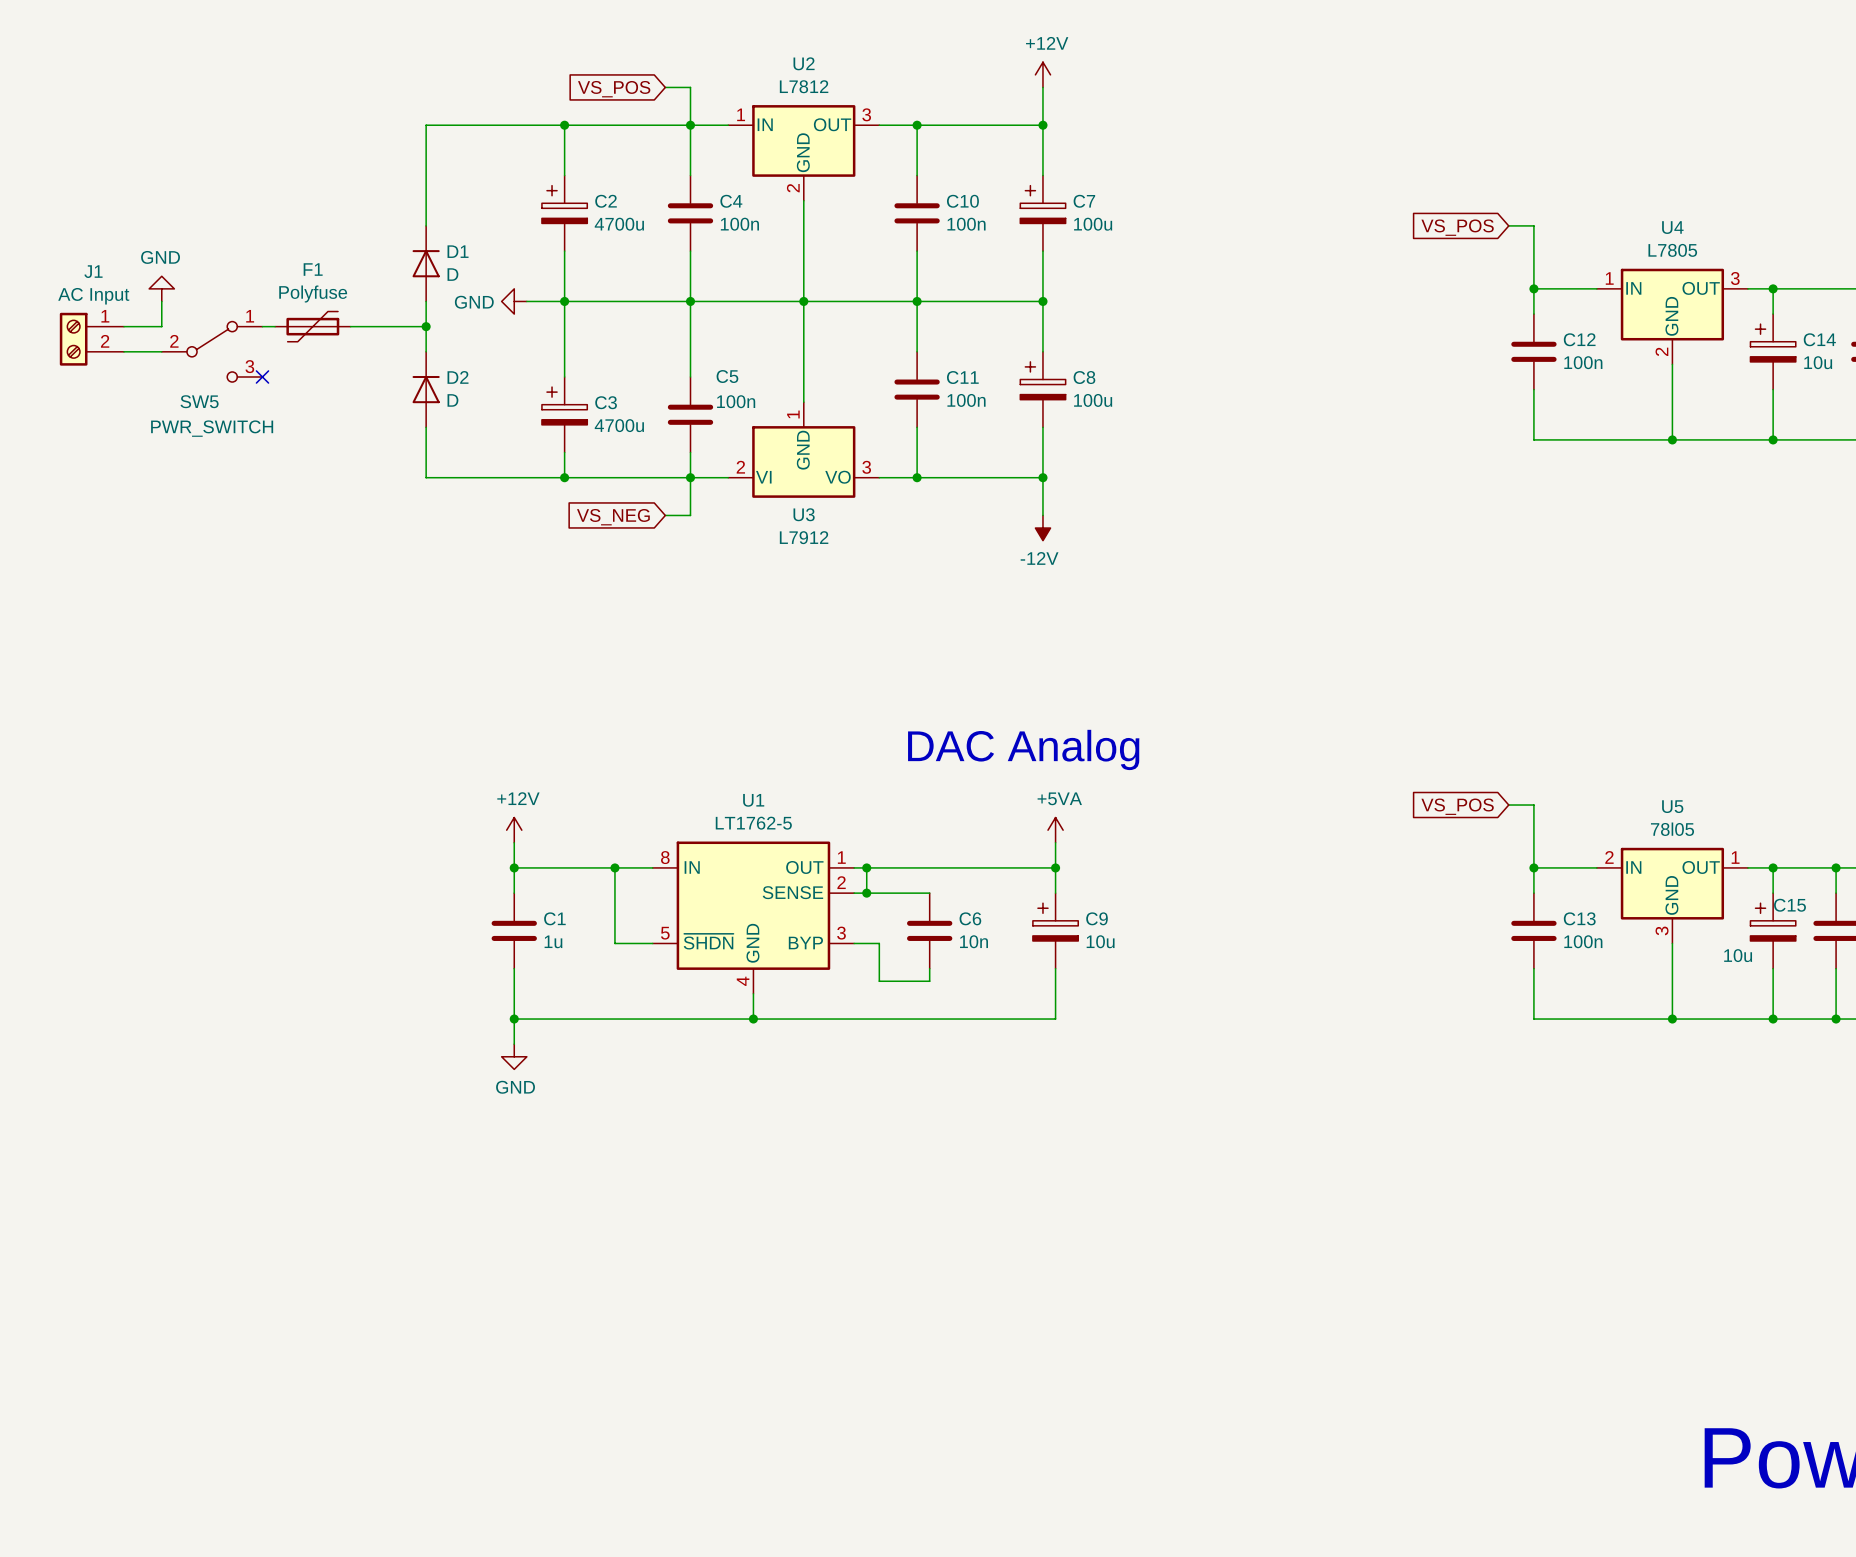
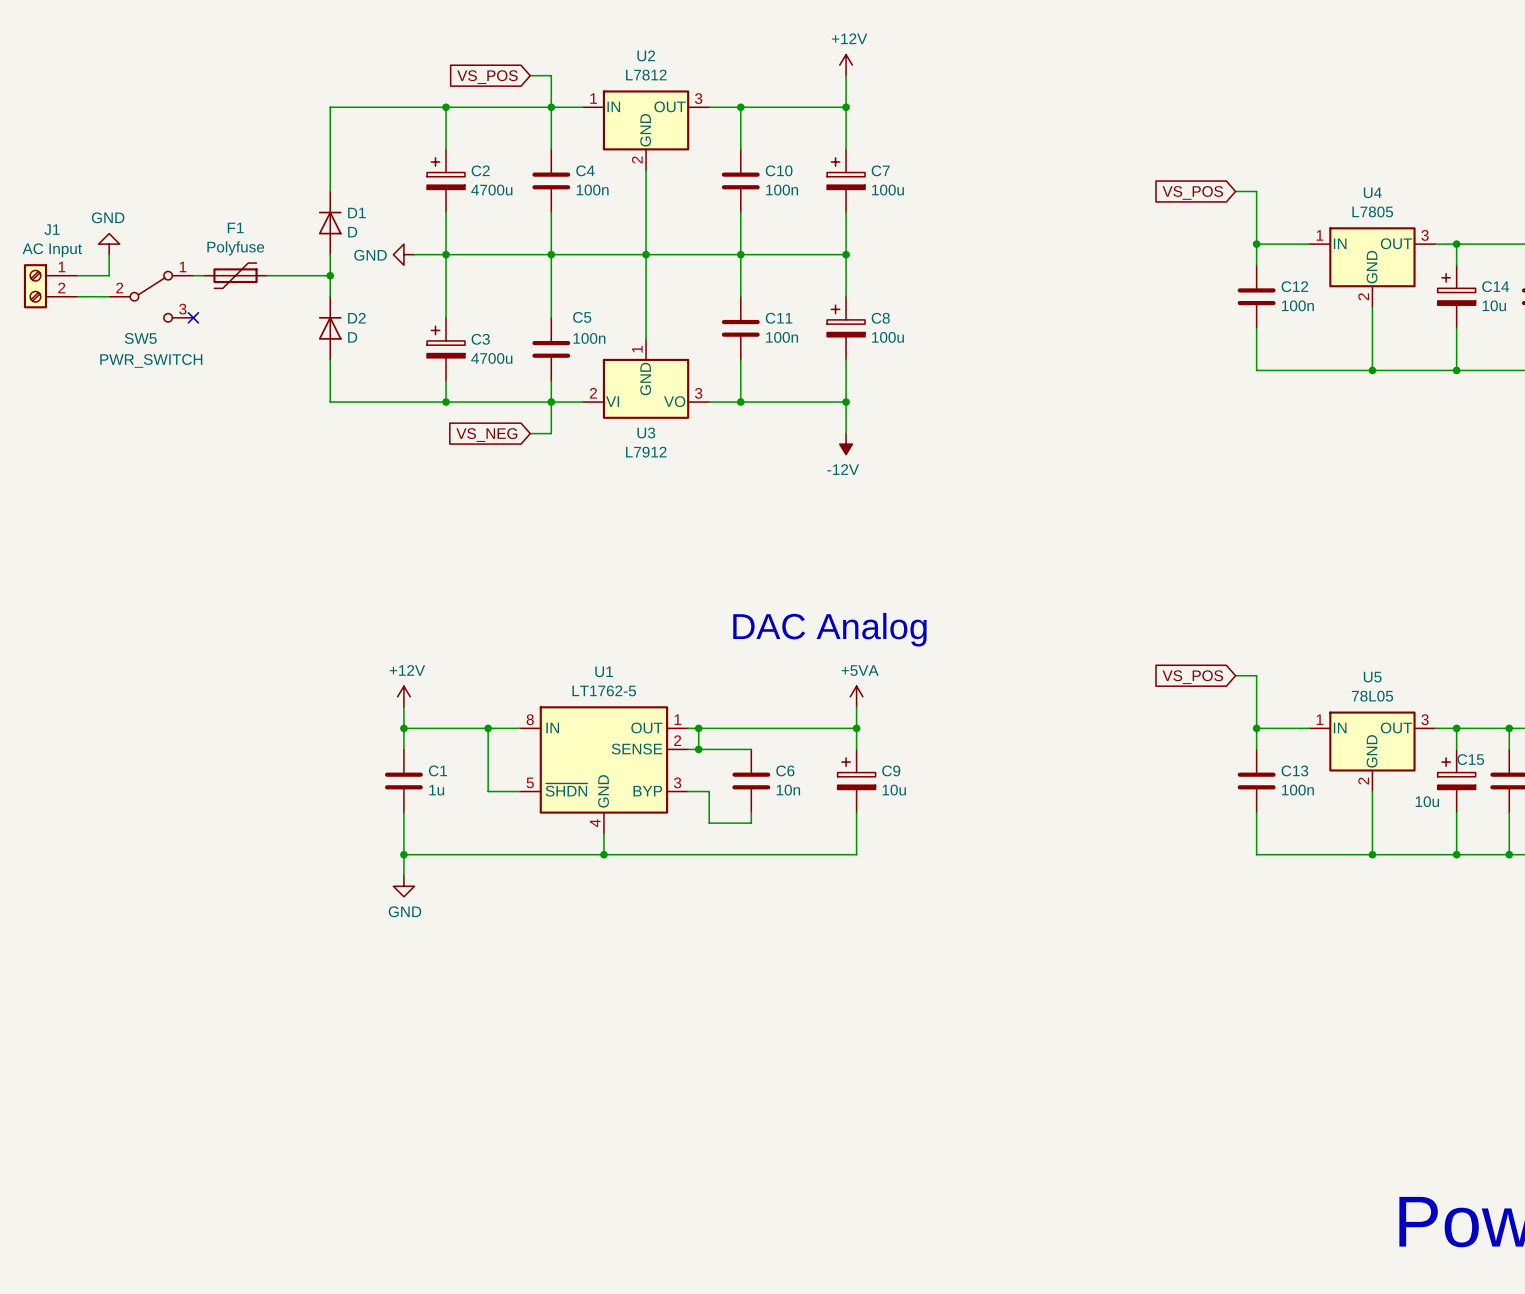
U5 value: 78l05 (1672, 829) -> 78L05 (1372, 696)
U5 pin number: 2 (1609, 857) -> 1 (1320, 719)
U5 pin number: 1 (1735, 857) -> 3 (1425, 719)
U5 pin number: 3 (1662, 930) -> 2 (1363, 781)

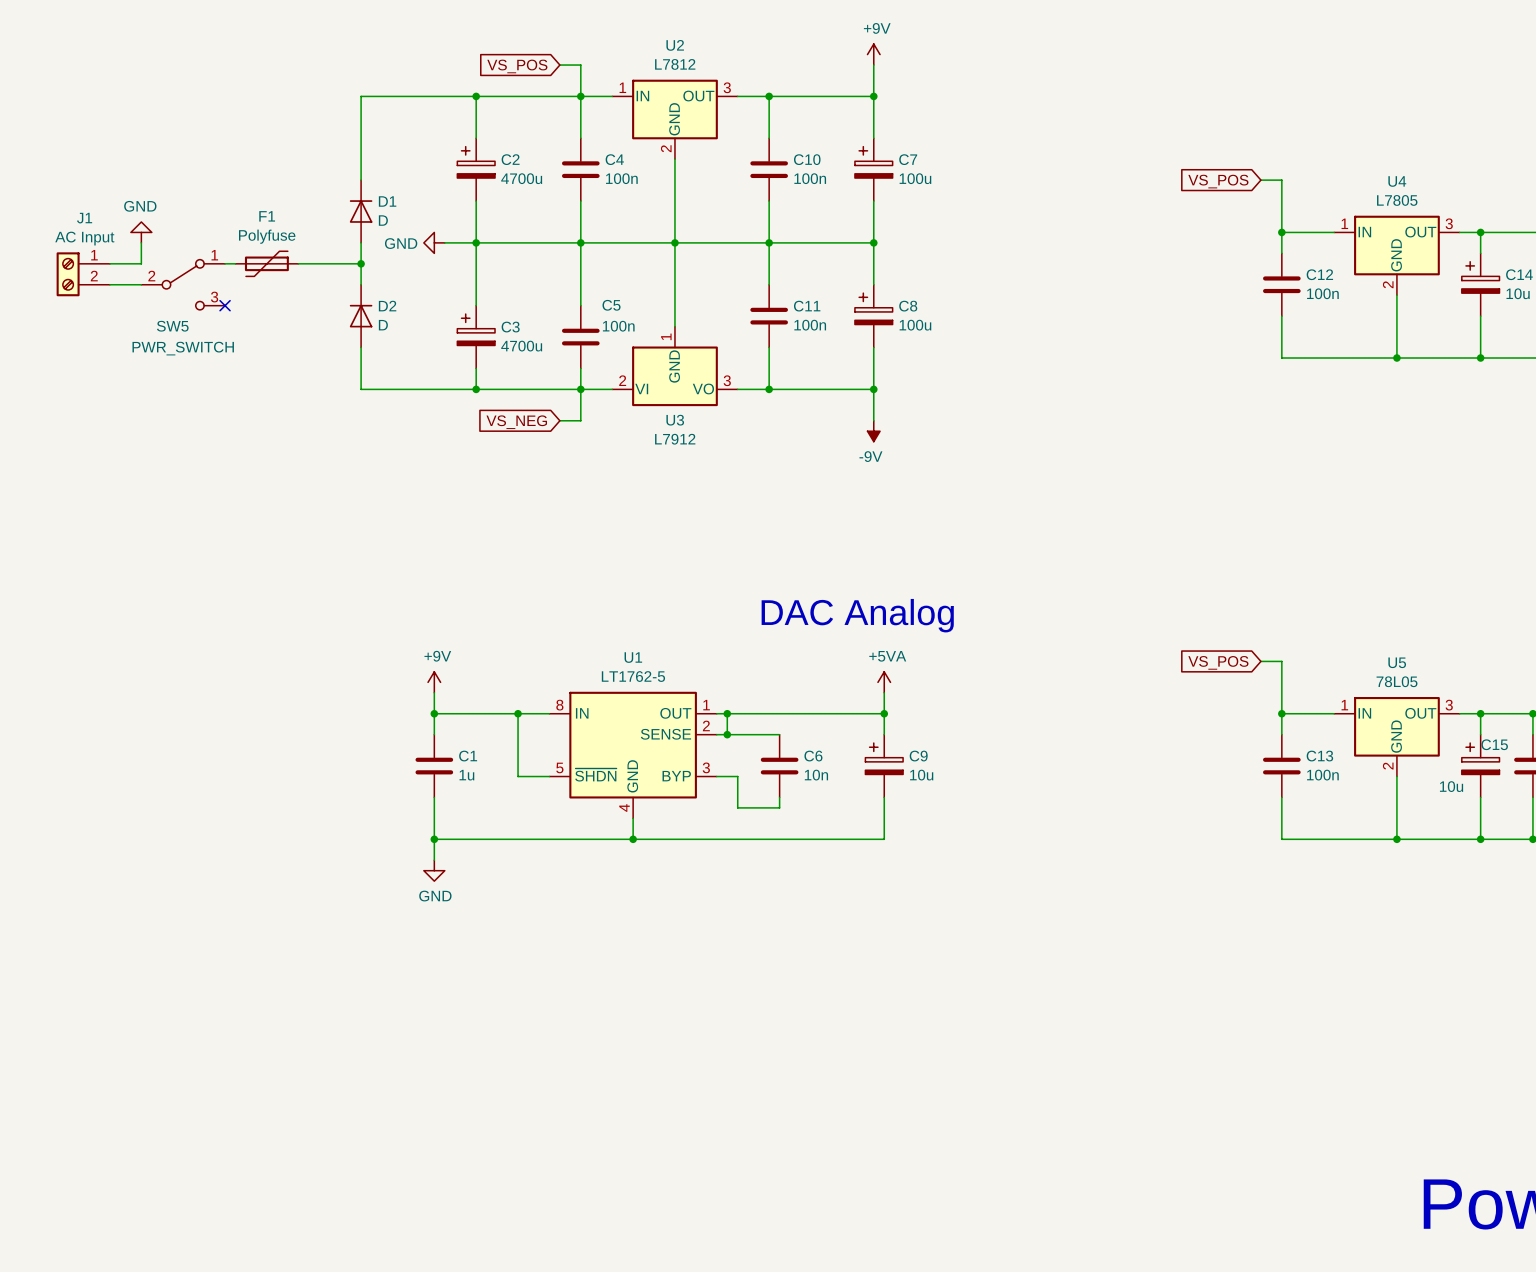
power symbol: +12V (846, 65) -> +9V (873, 54)
power symbol: -12V (846, 444) -> -9V (873, 431)
power symbol: +12V (403, 696) -> +9V (434, 682)

